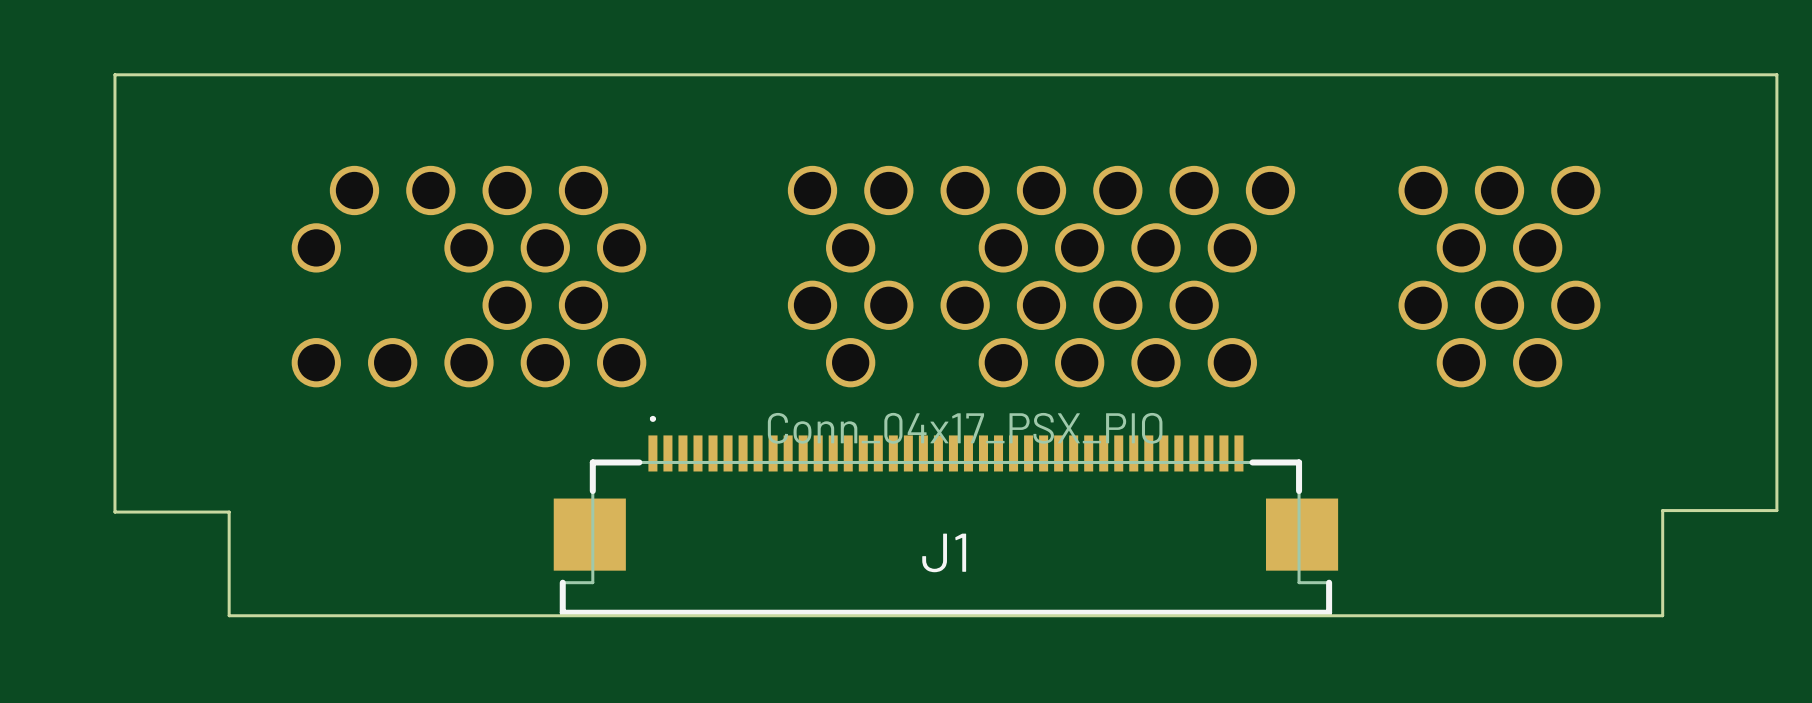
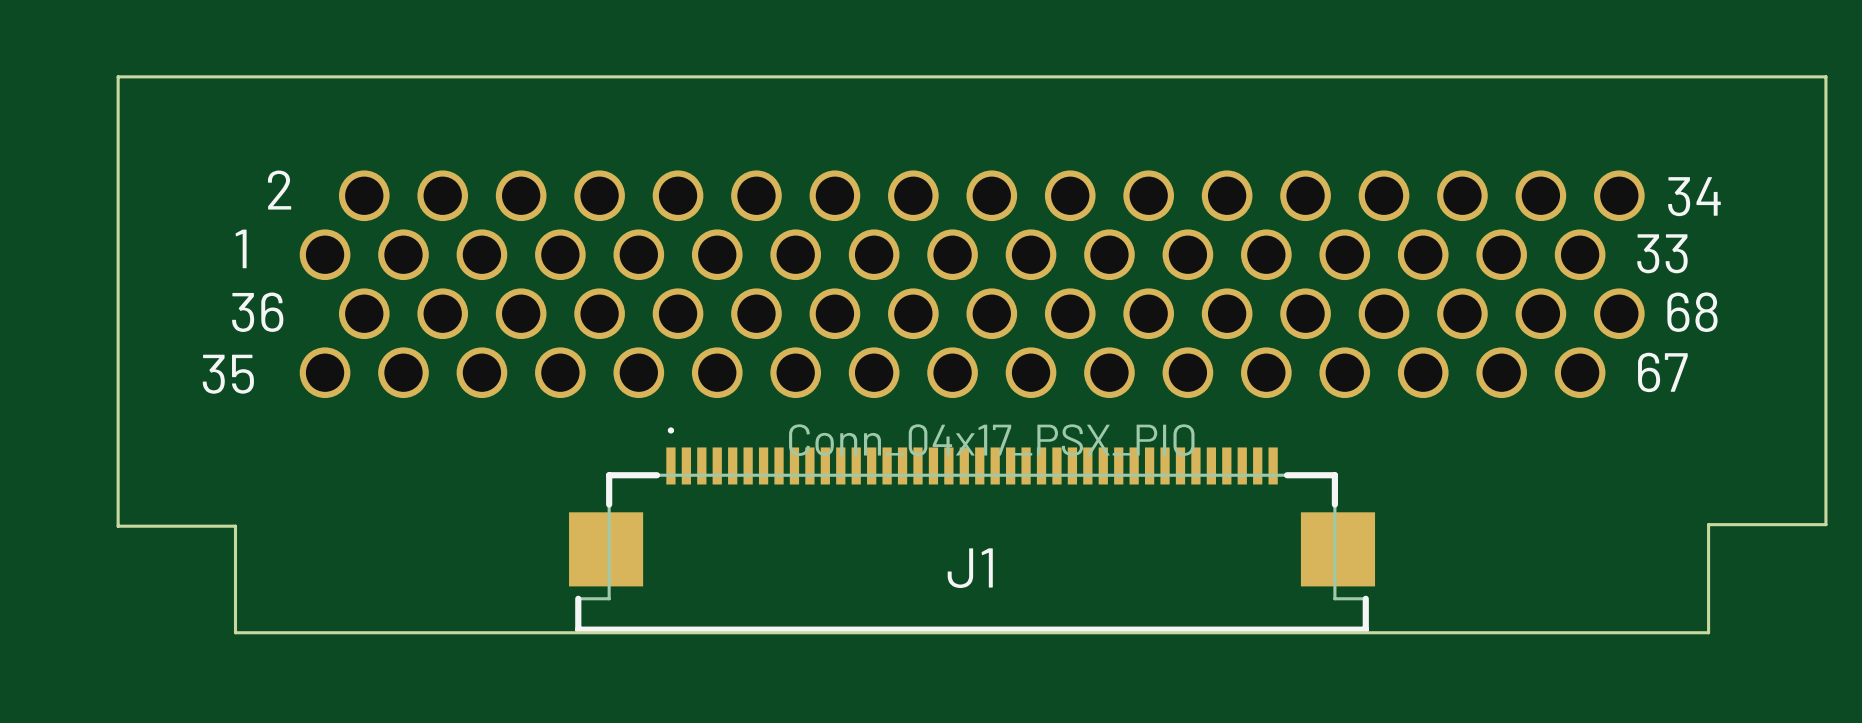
part footprint: [291, 165, 1601, 388] -> [299, 170, 1645, 399]
text: none -> 2 (279, 190)
text: none -> 34 (1694, 196)
text: none -> 1 (241, 248)
text: none -> 33 (1662, 253)
text: none -> 36 (257, 312)
text: none -> 68 (1692, 312)
text: none -> 67 (1662, 372)
text: none -> 35 (228, 374)

